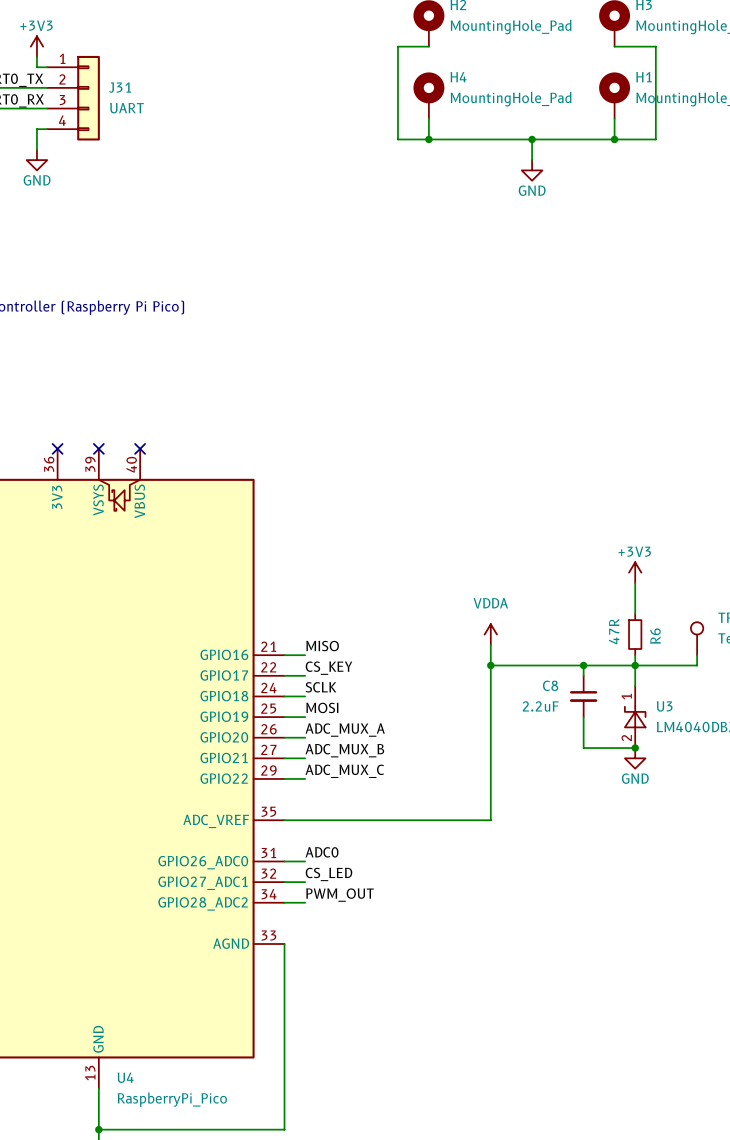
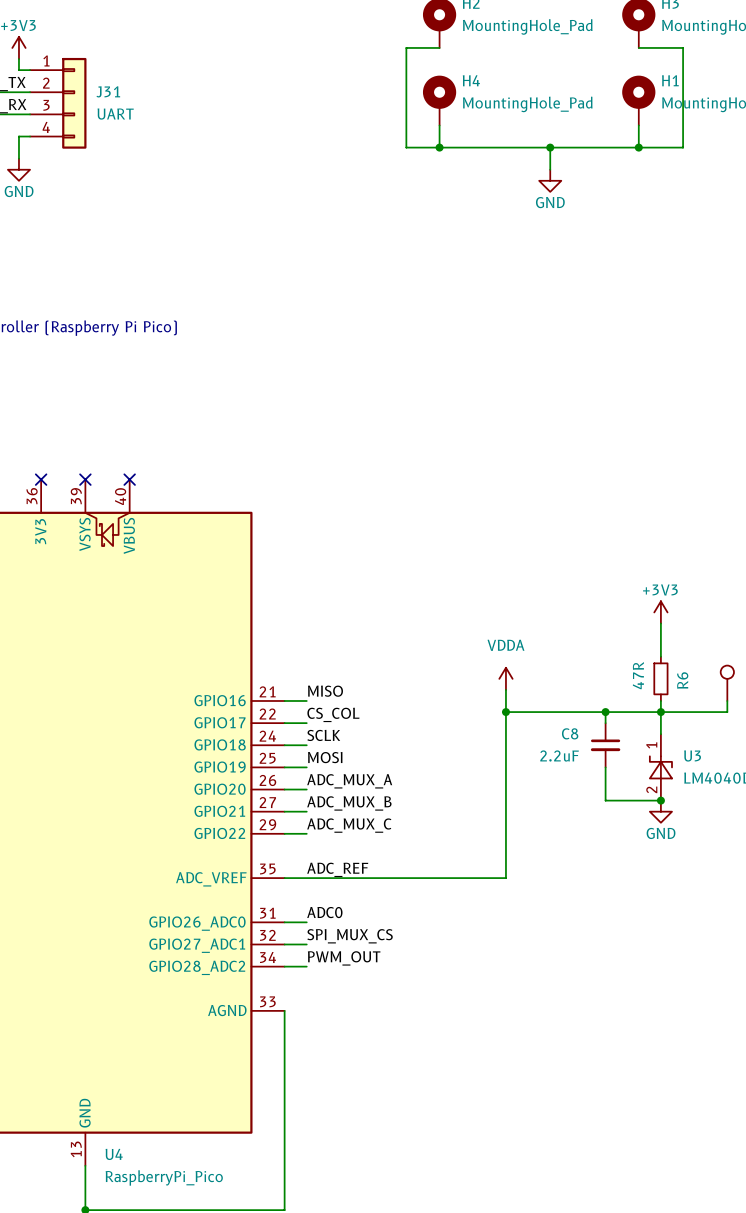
label: CS_KEY (328, 668) -> CS_COL (333, 714)
label: none -> ADC_REF (337, 869)
label: CS_LED (328, 874) -> SPI_MUX_CS (350, 936)

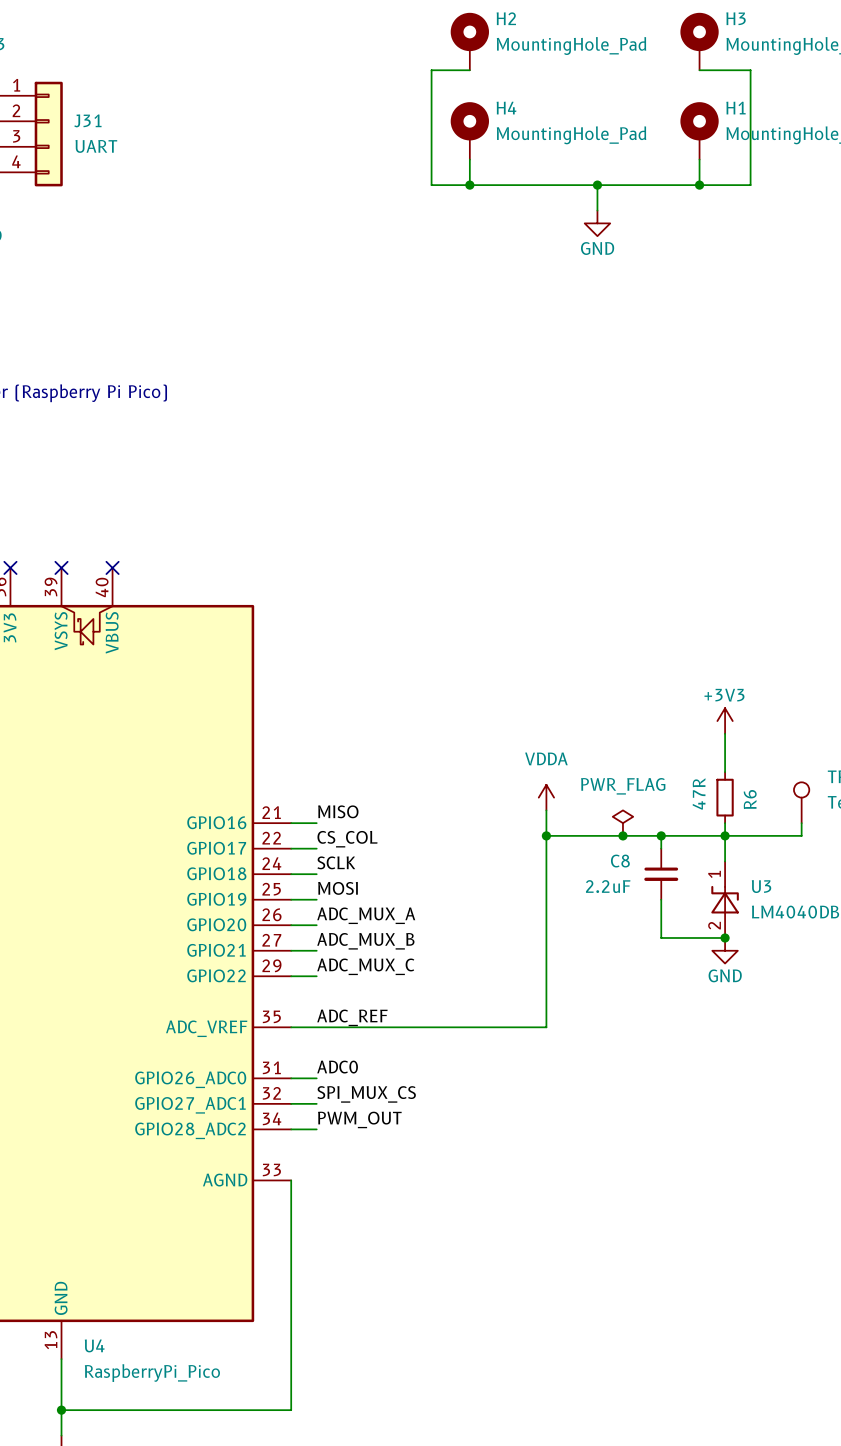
power symbol: none -> PWR_FLAG (622, 823)
junction: none -> (622, 835)

